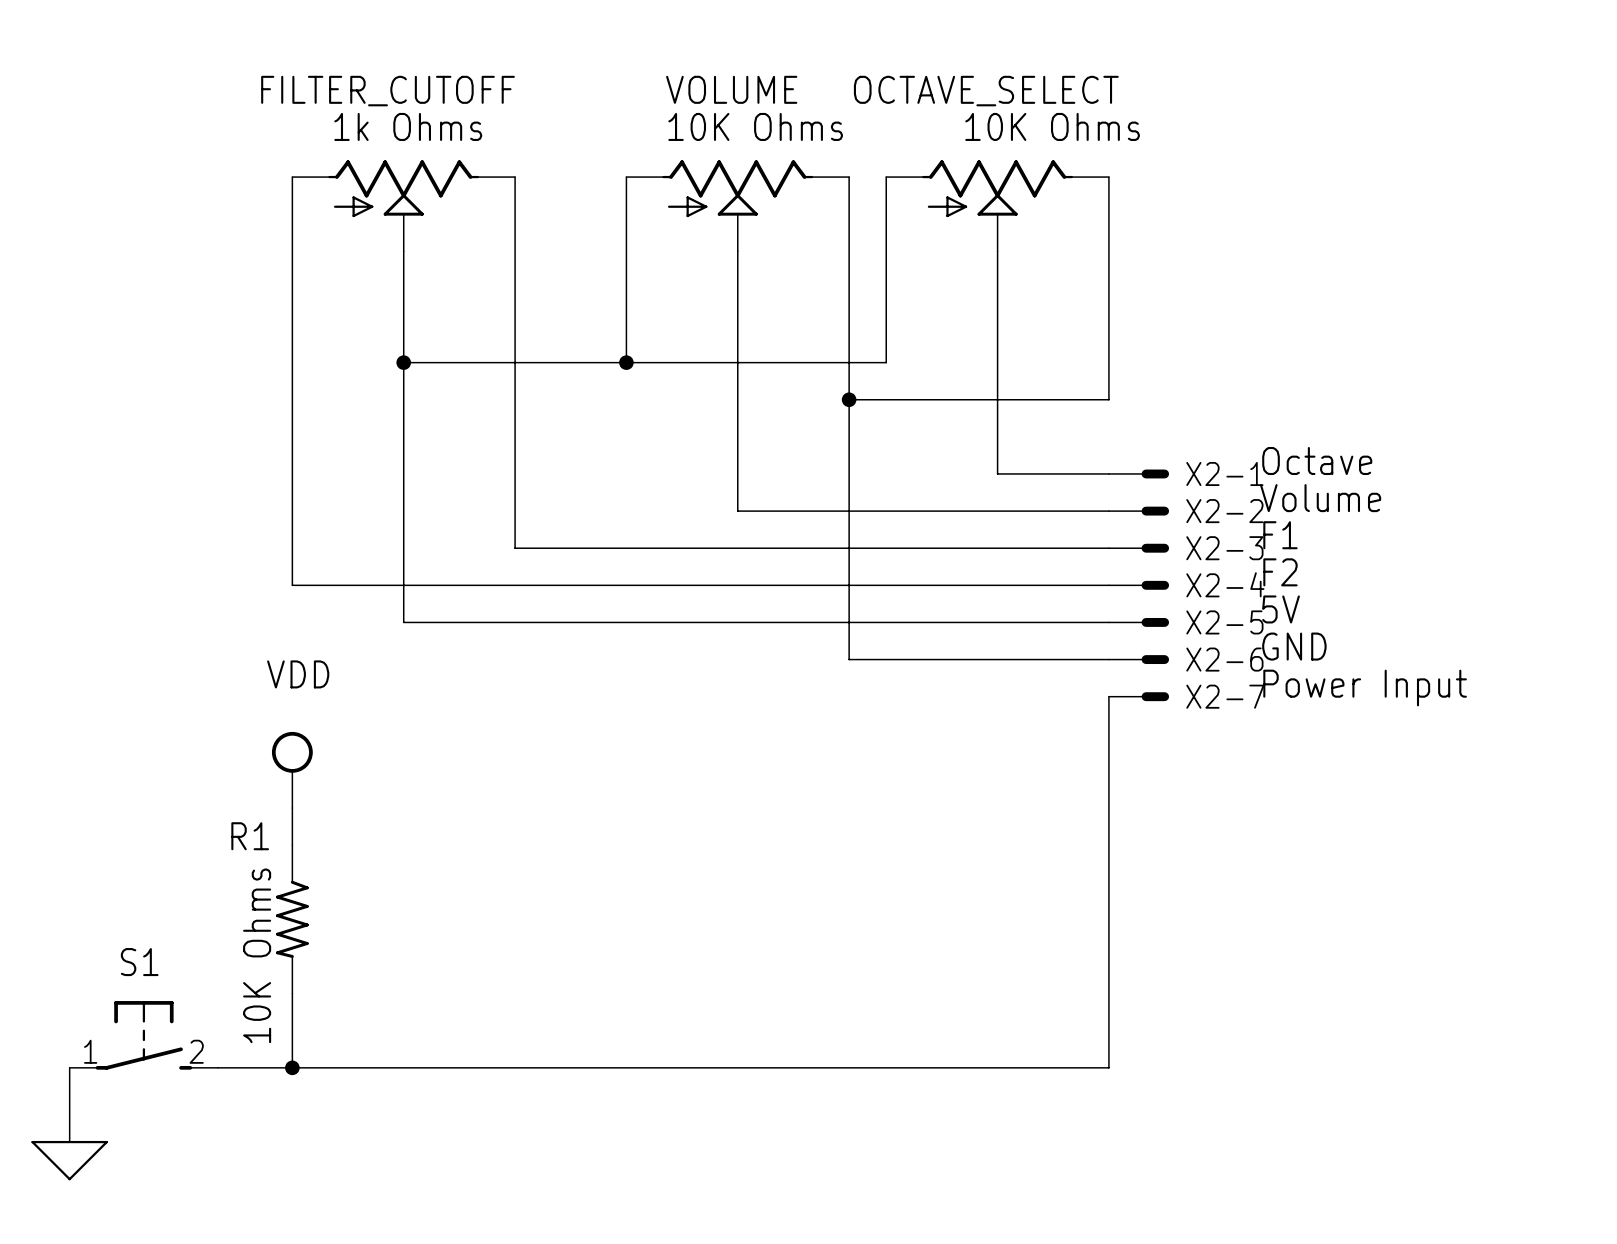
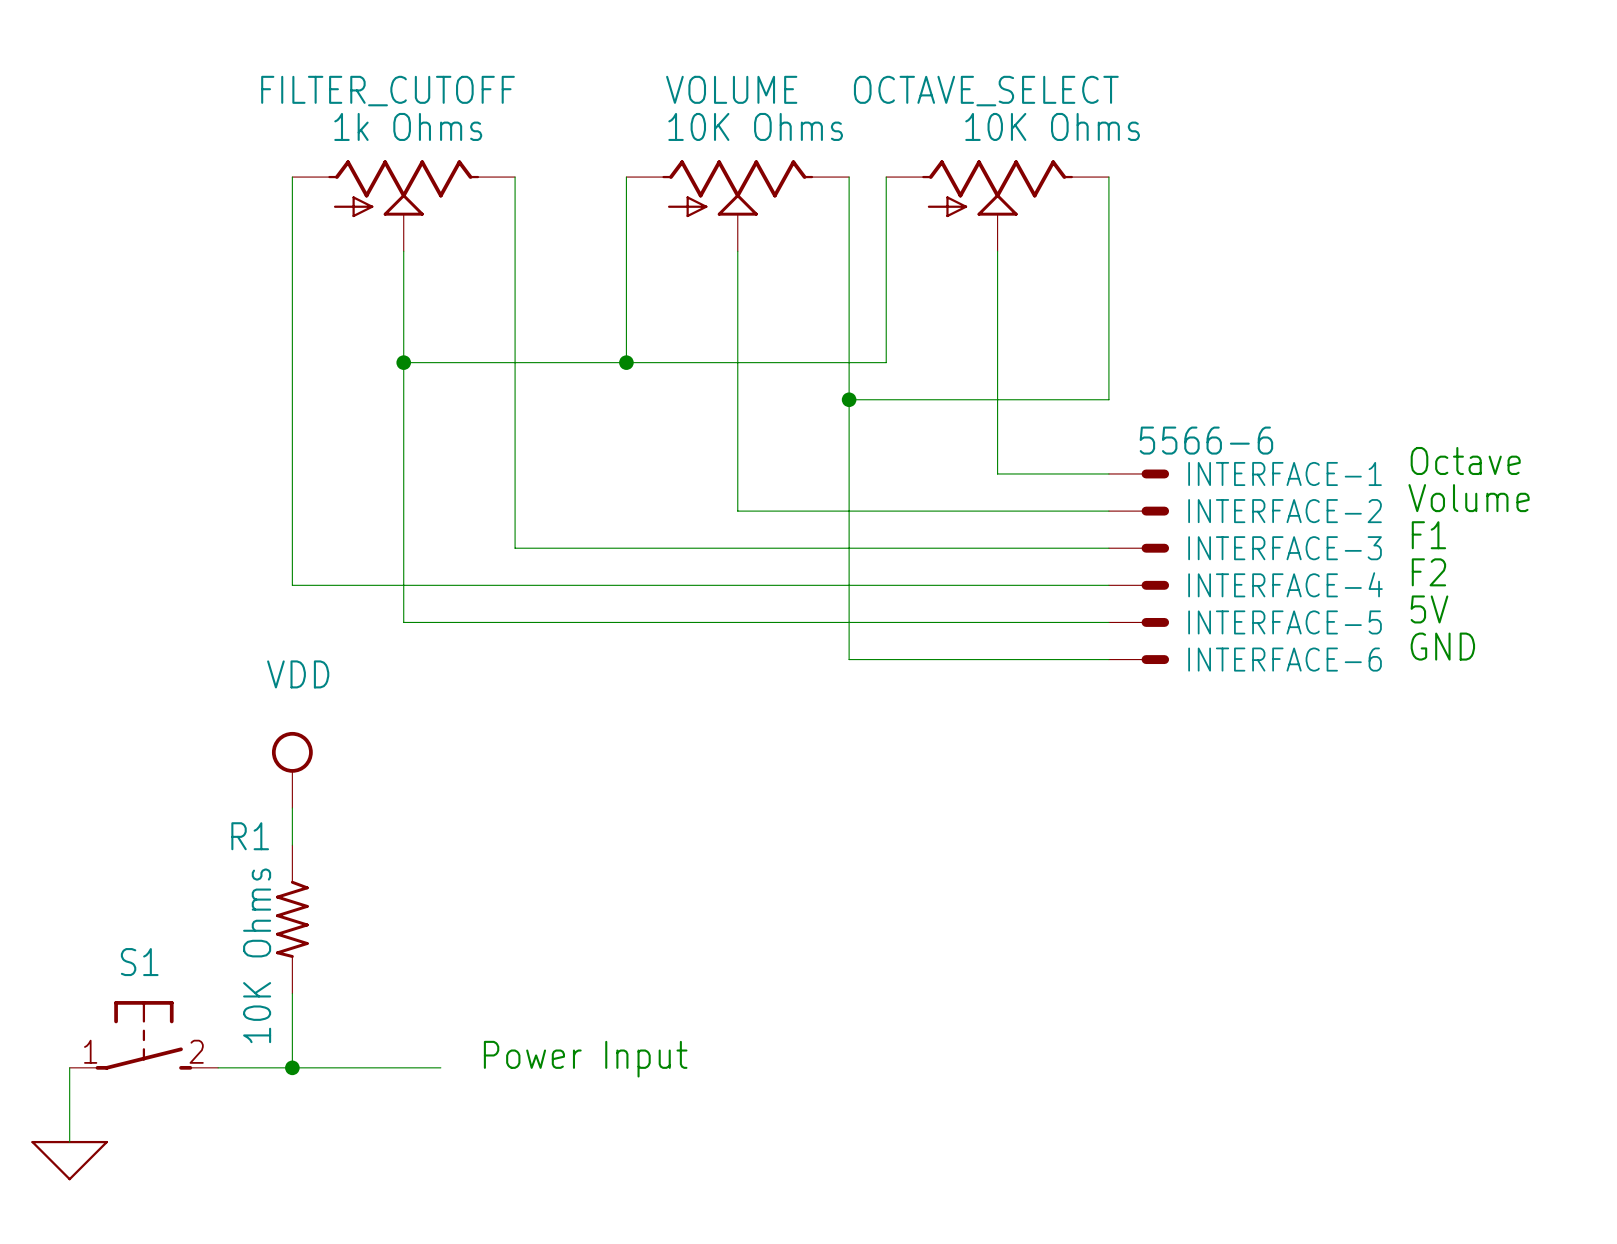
X2-1 value: none -> 5566-6 (1206, 440)
text position: Octave (1317, 460) -> Octave (1465, 460)
X2-1 name: X2-1 (1224, 473) -> INTERFACE-1 (1285, 473)
text position: Volume (1320, 498) -> Volume (1469, 498)
X2-2 name: X2-2 (1224, 511) -> INTERFACE-2 (1285, 511)
text position: F1 (1280, 535) -> F1 (1428, 535)
X2-3 name: X2-3 (1224, 548) -> INTERFACE-3 (1285, 548)
text position: F2 (1280, 572) -> F2 (1428, 572)
X2-4 name: X2-4 (1225, 584) -> INTERFACE-4 (1285, 584)
text position: 5V (1281, 609) -> 5V (1429, 609)
X2-5 name: X2-5 (1224, 622) -> INTERFACE-5 (1285, 622)
text position: GND (1294, 646) -> GND (1442, 646)
X2-6 name: X2-6 (1224, 659) -> INTERFACE-6 (1285, 659)
text: Power Input (1365, 688) -> none
wire: (1108, 696) (1108, 1067) (440, 1067) -> none
X2-7: (1138, 696) -> none
text: none -> Power Input (585, 1059)

